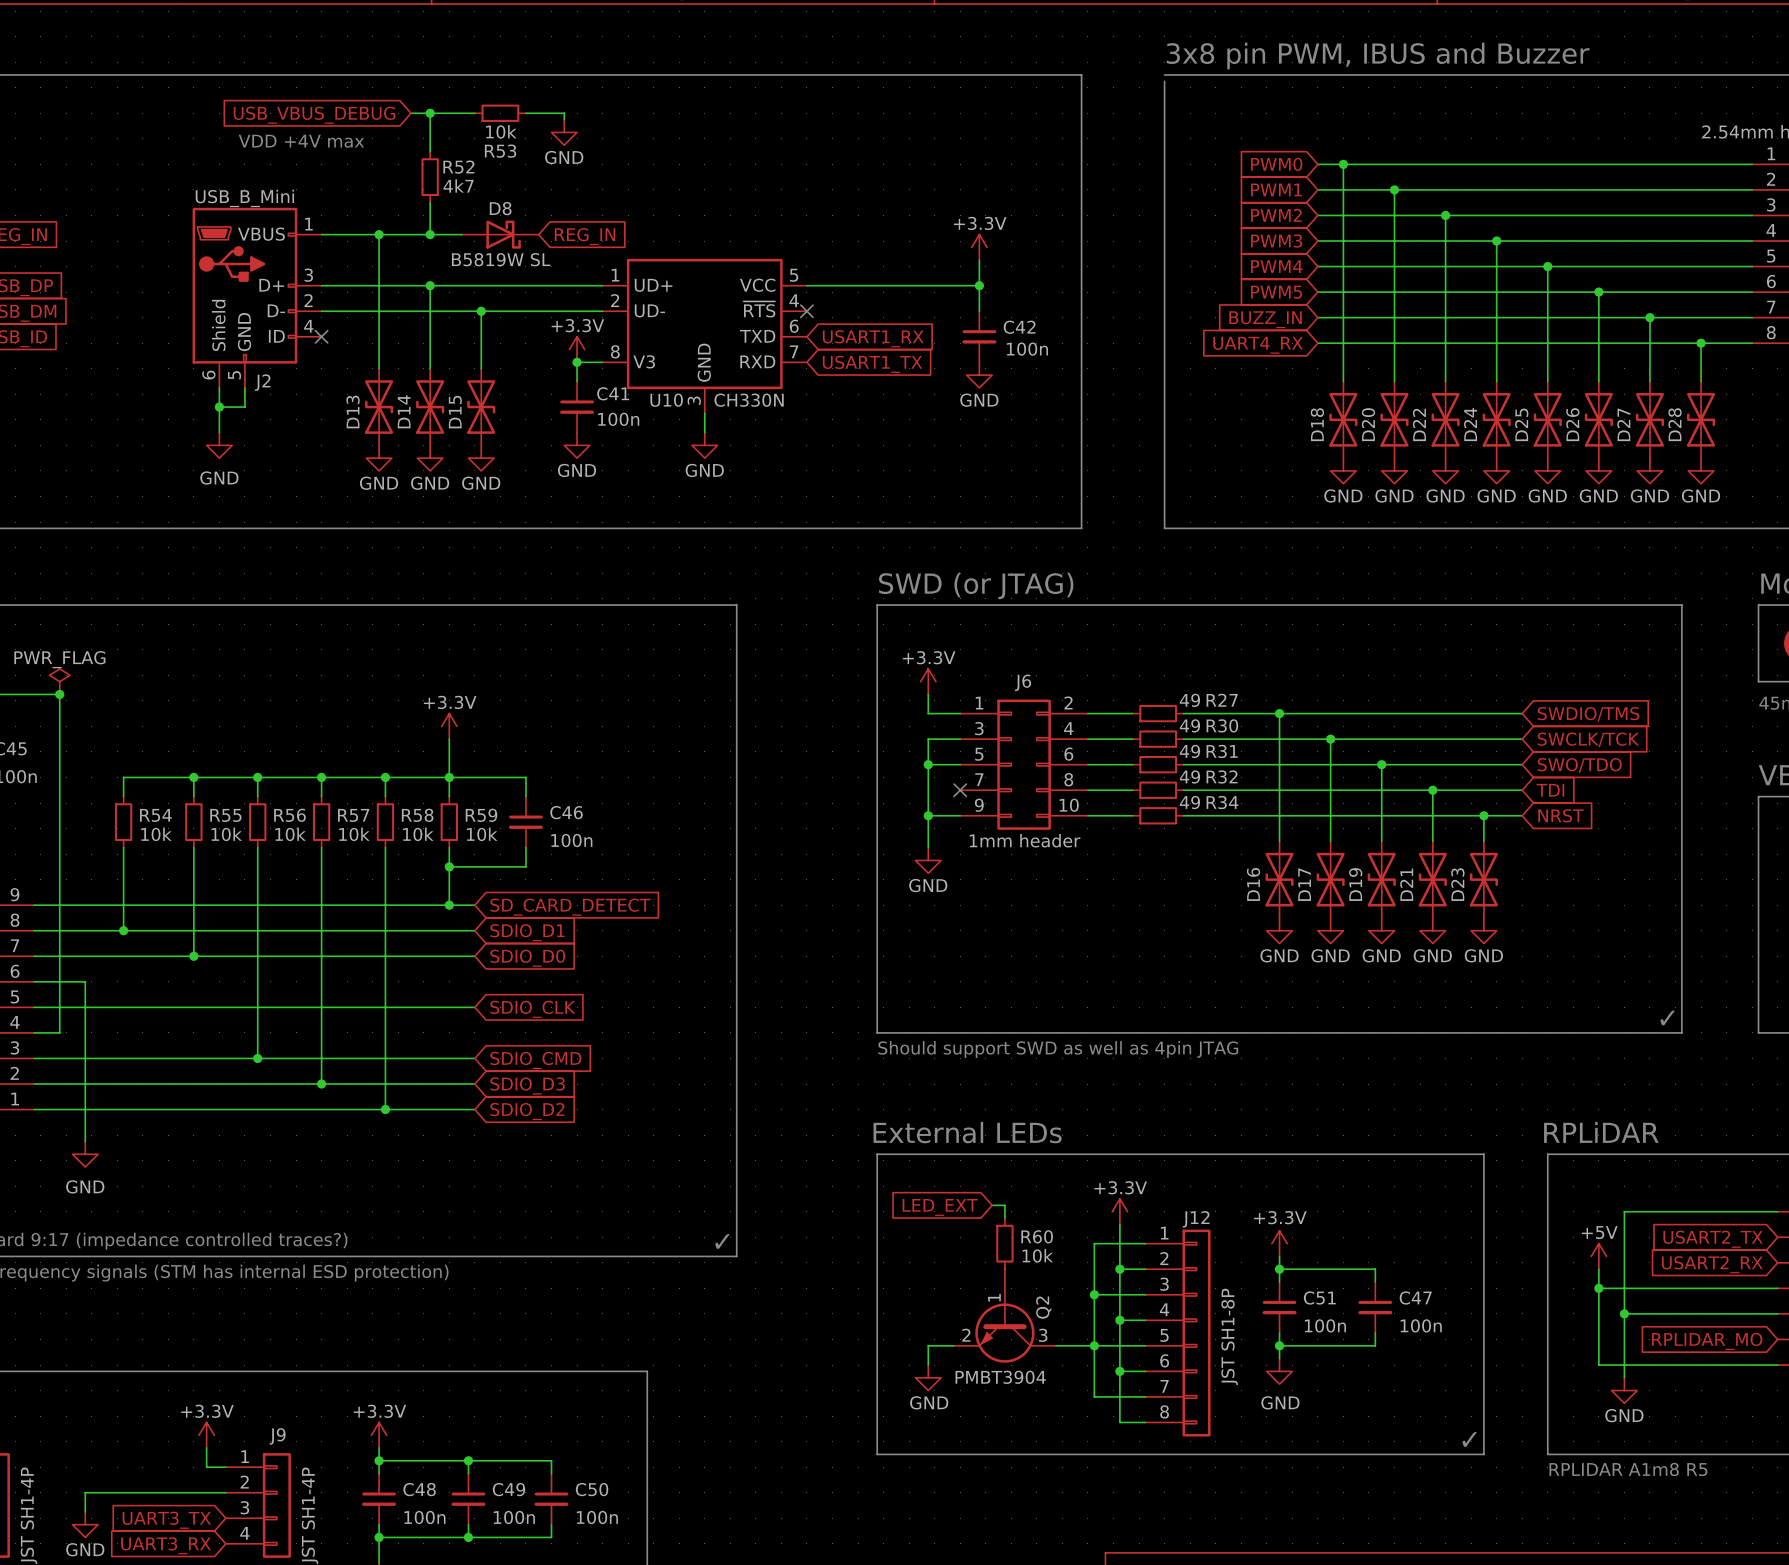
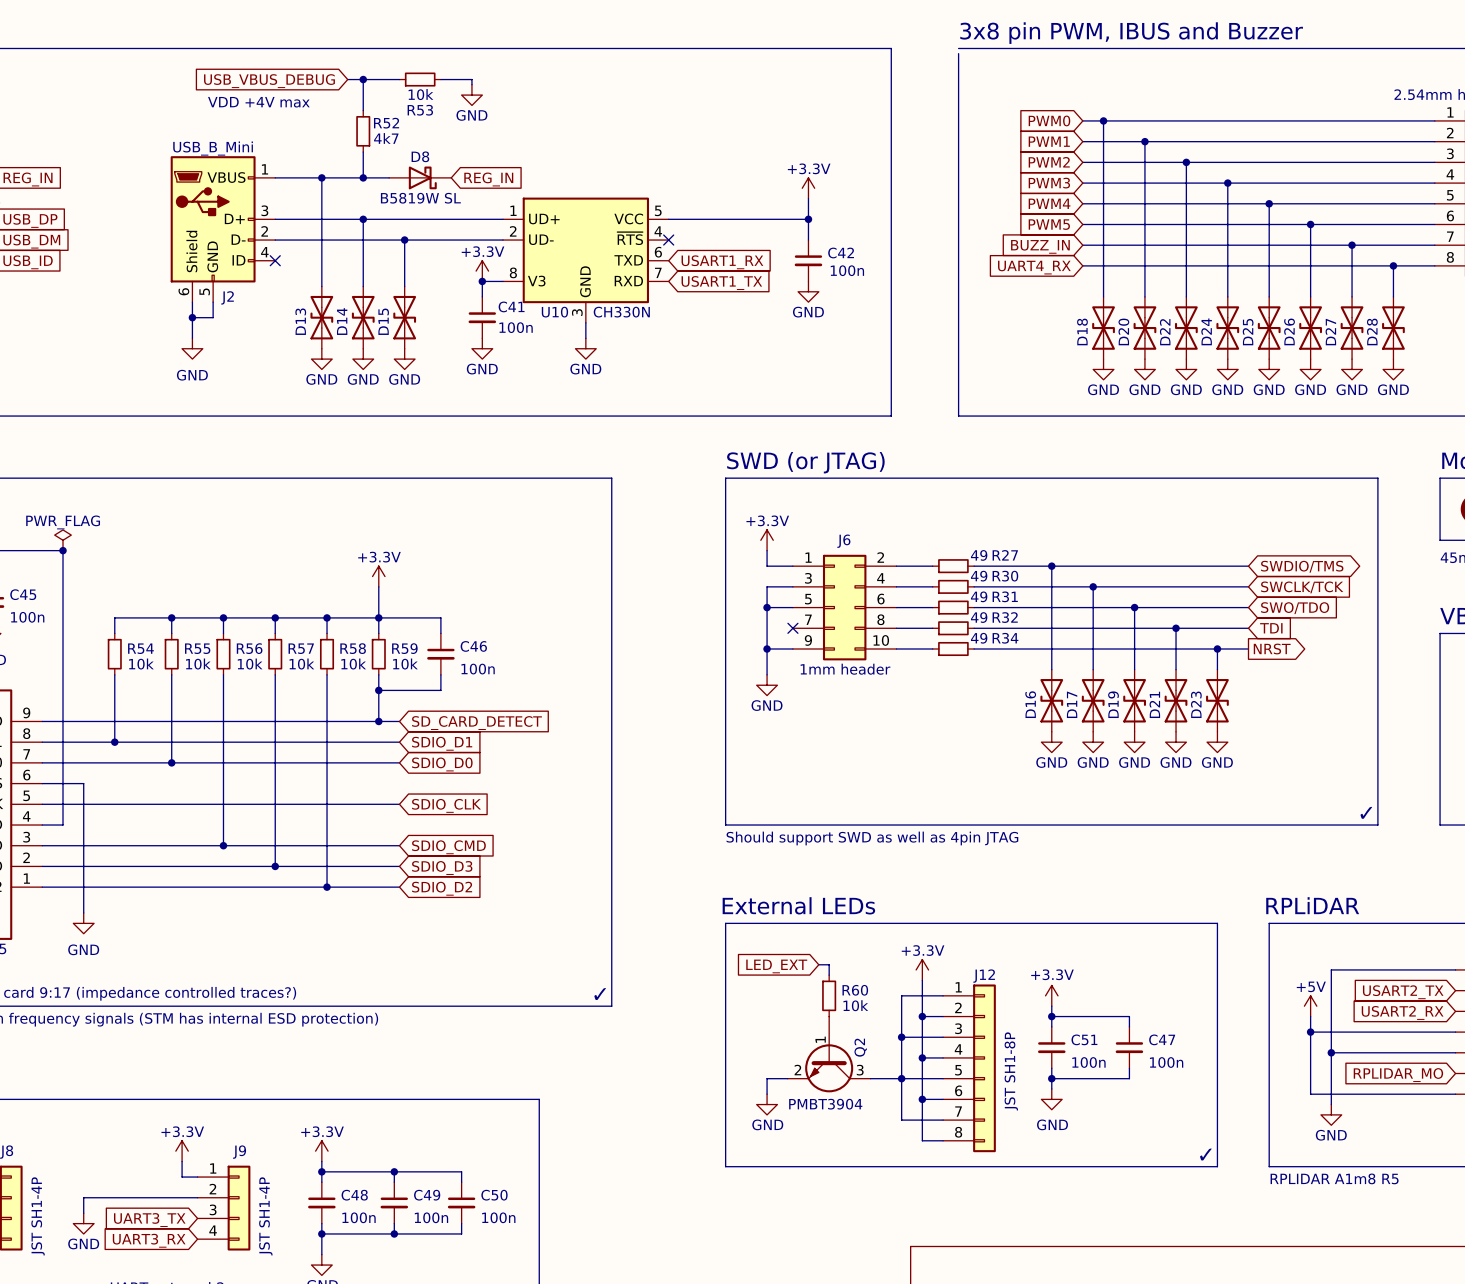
global label shape: input (1588, 714) -> bidirectional (1302, 566)
global label shape: input (1561, 815) -> output (1272, 649)

